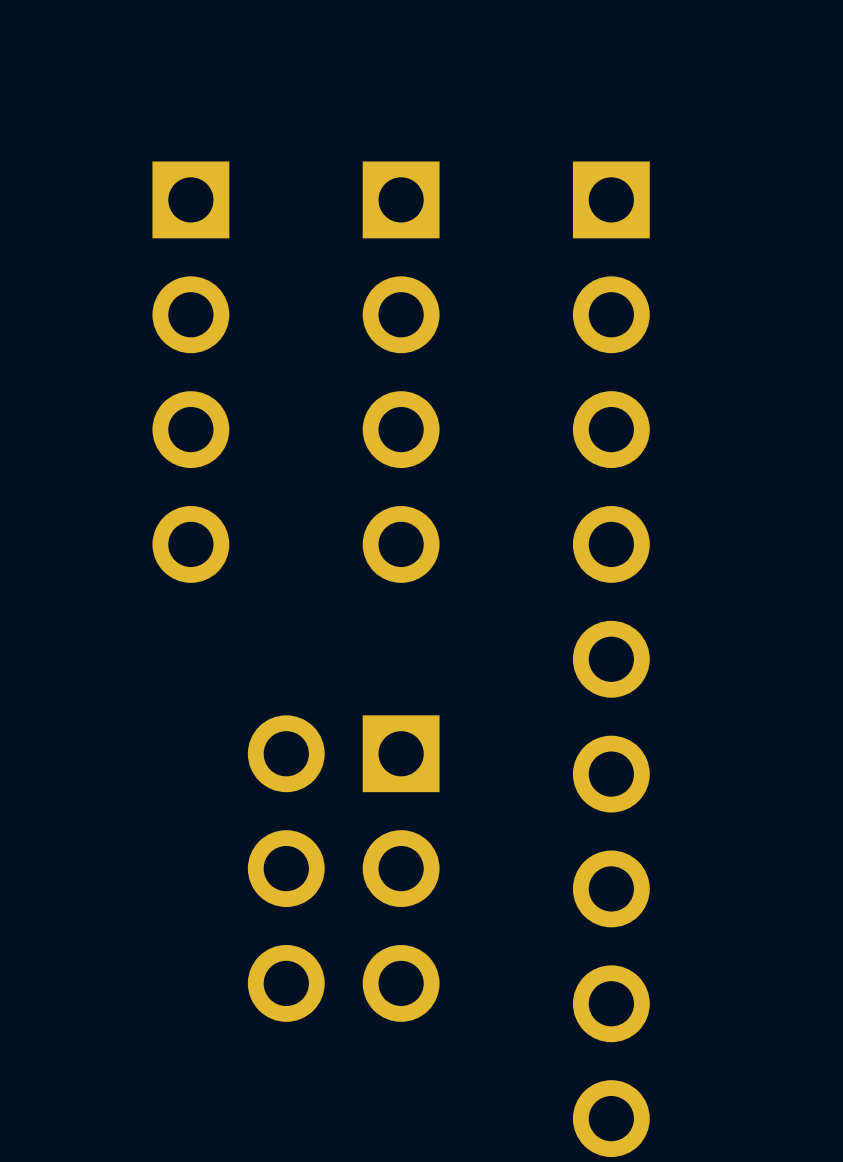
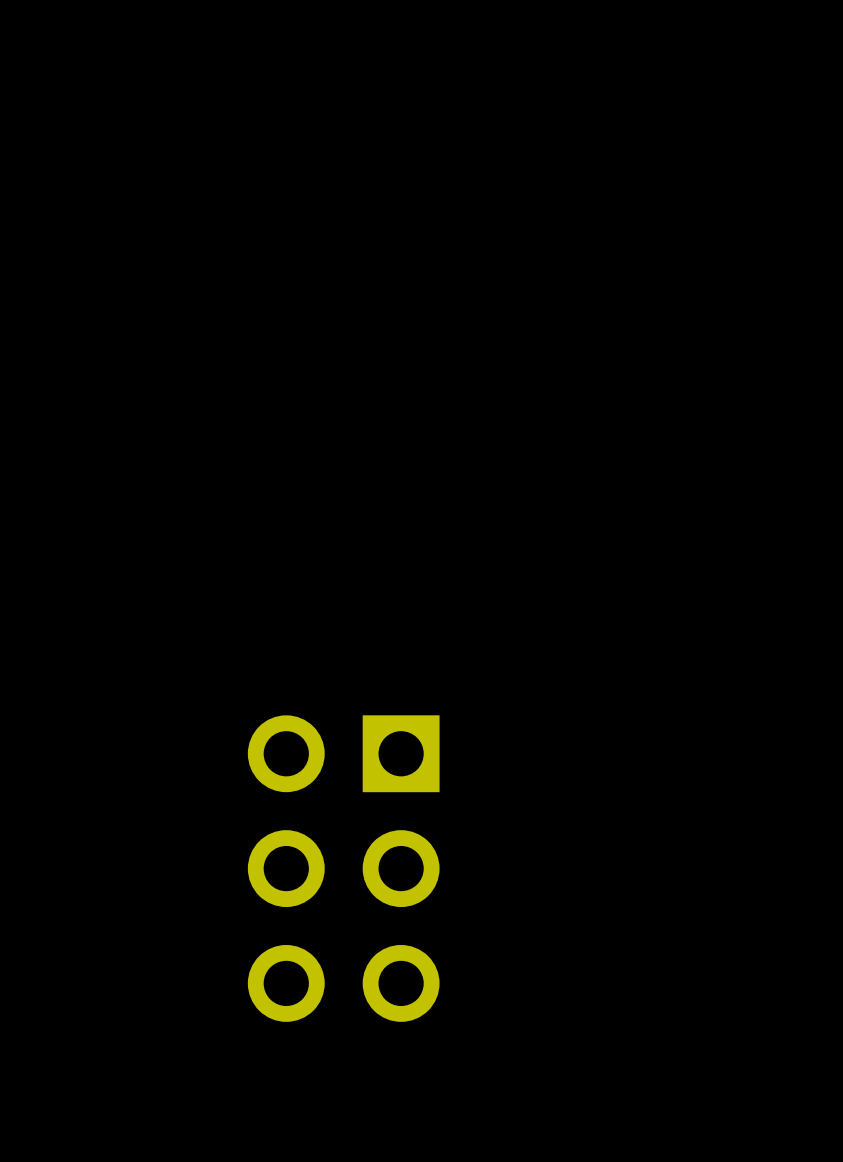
part: (190, 372) -> none
part: (401, 372) -> none
part: (611, 659) -> none

